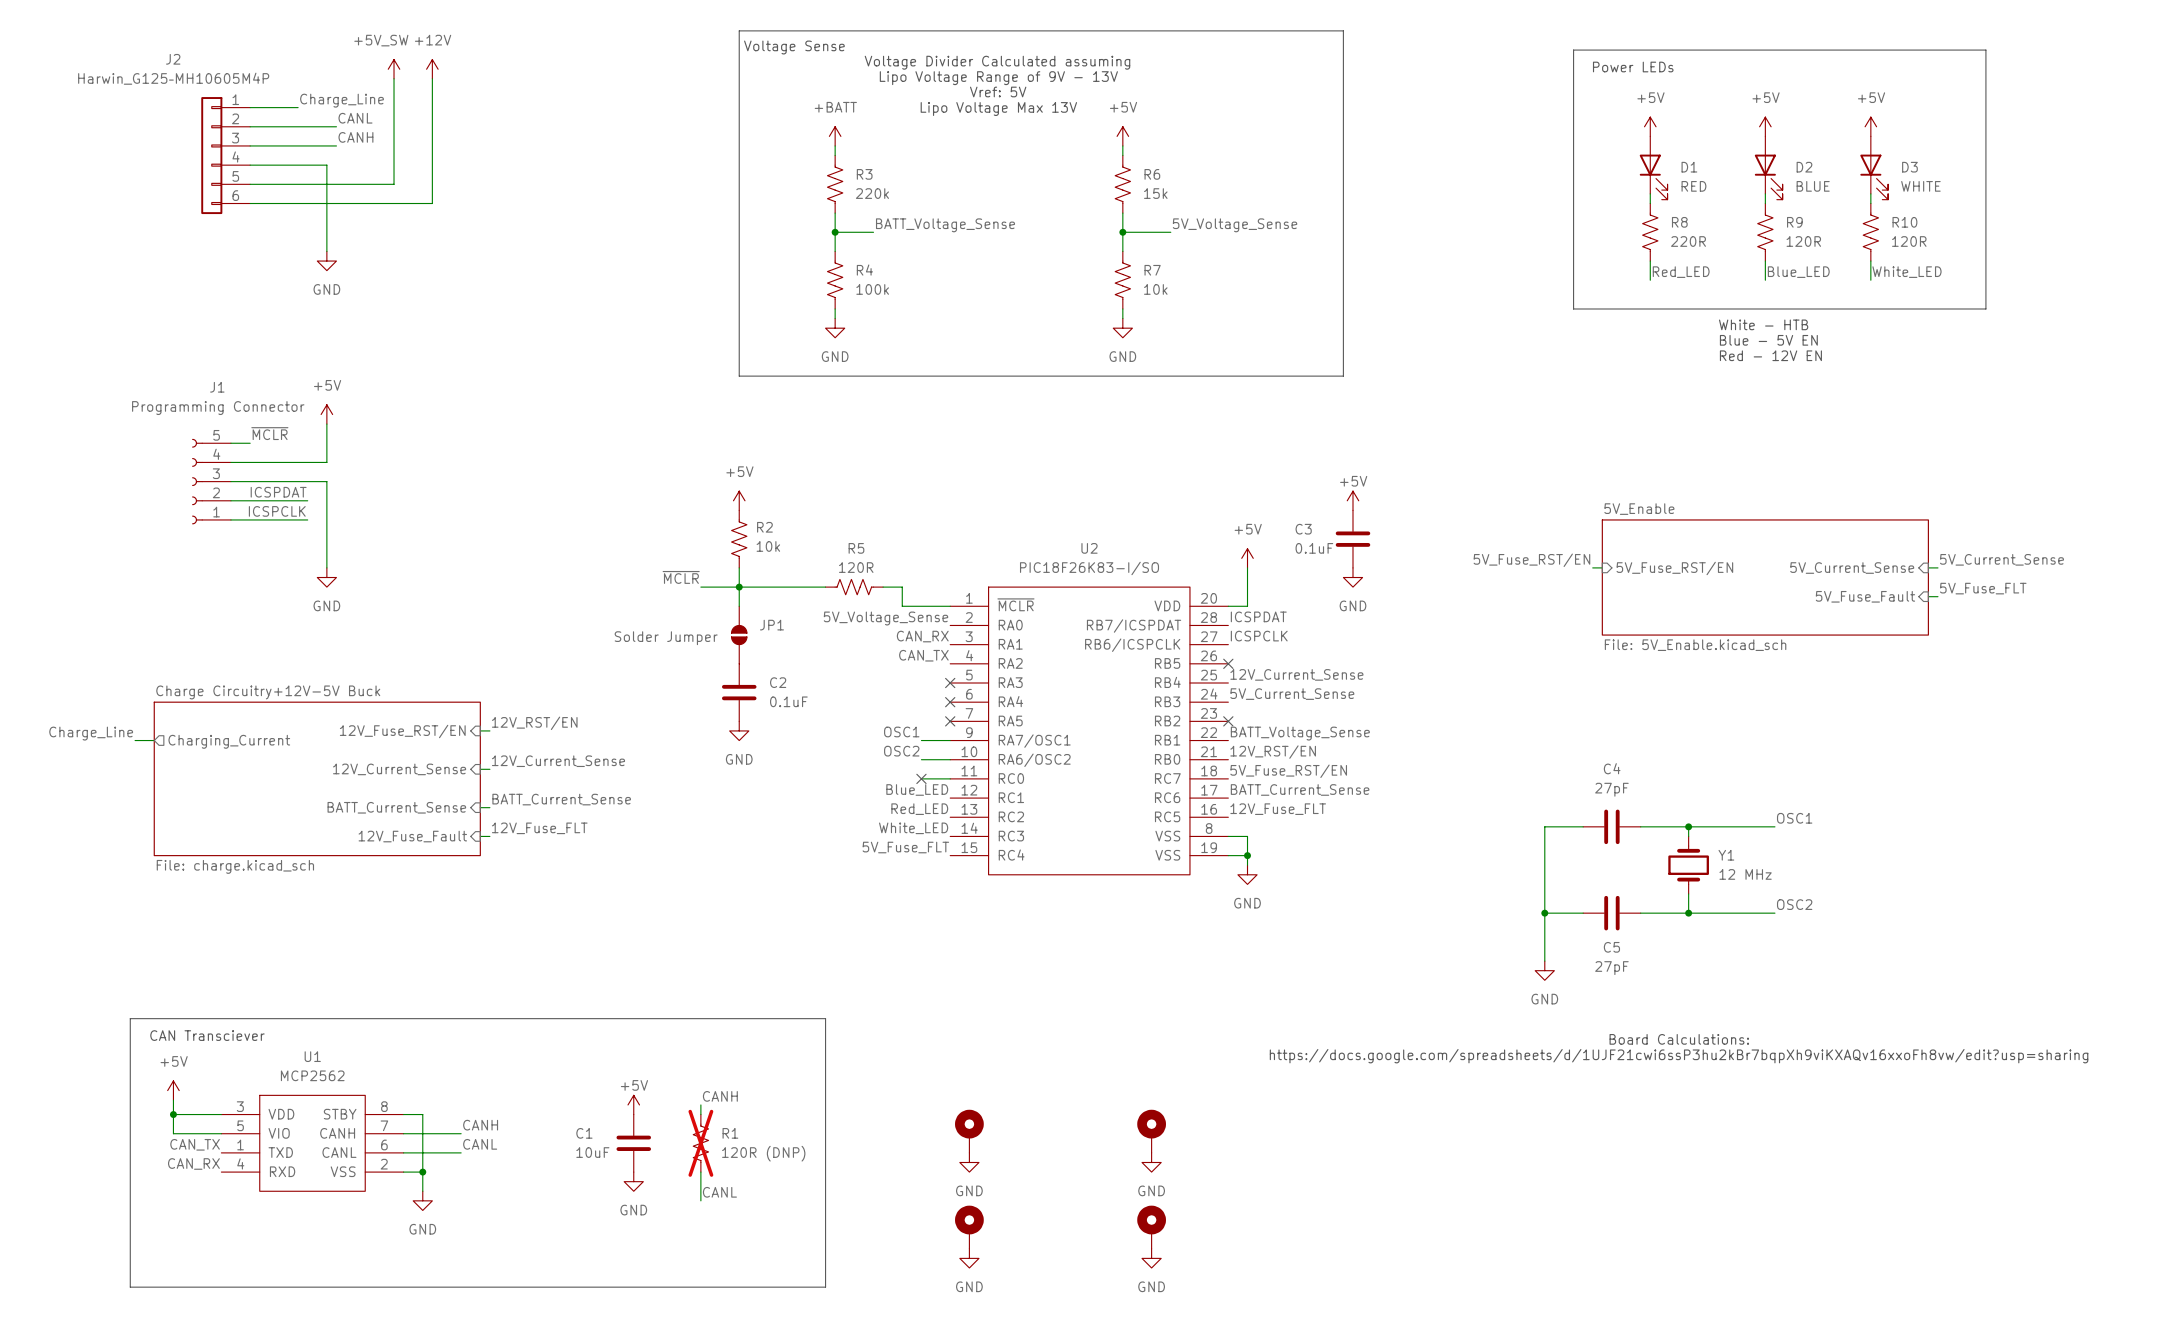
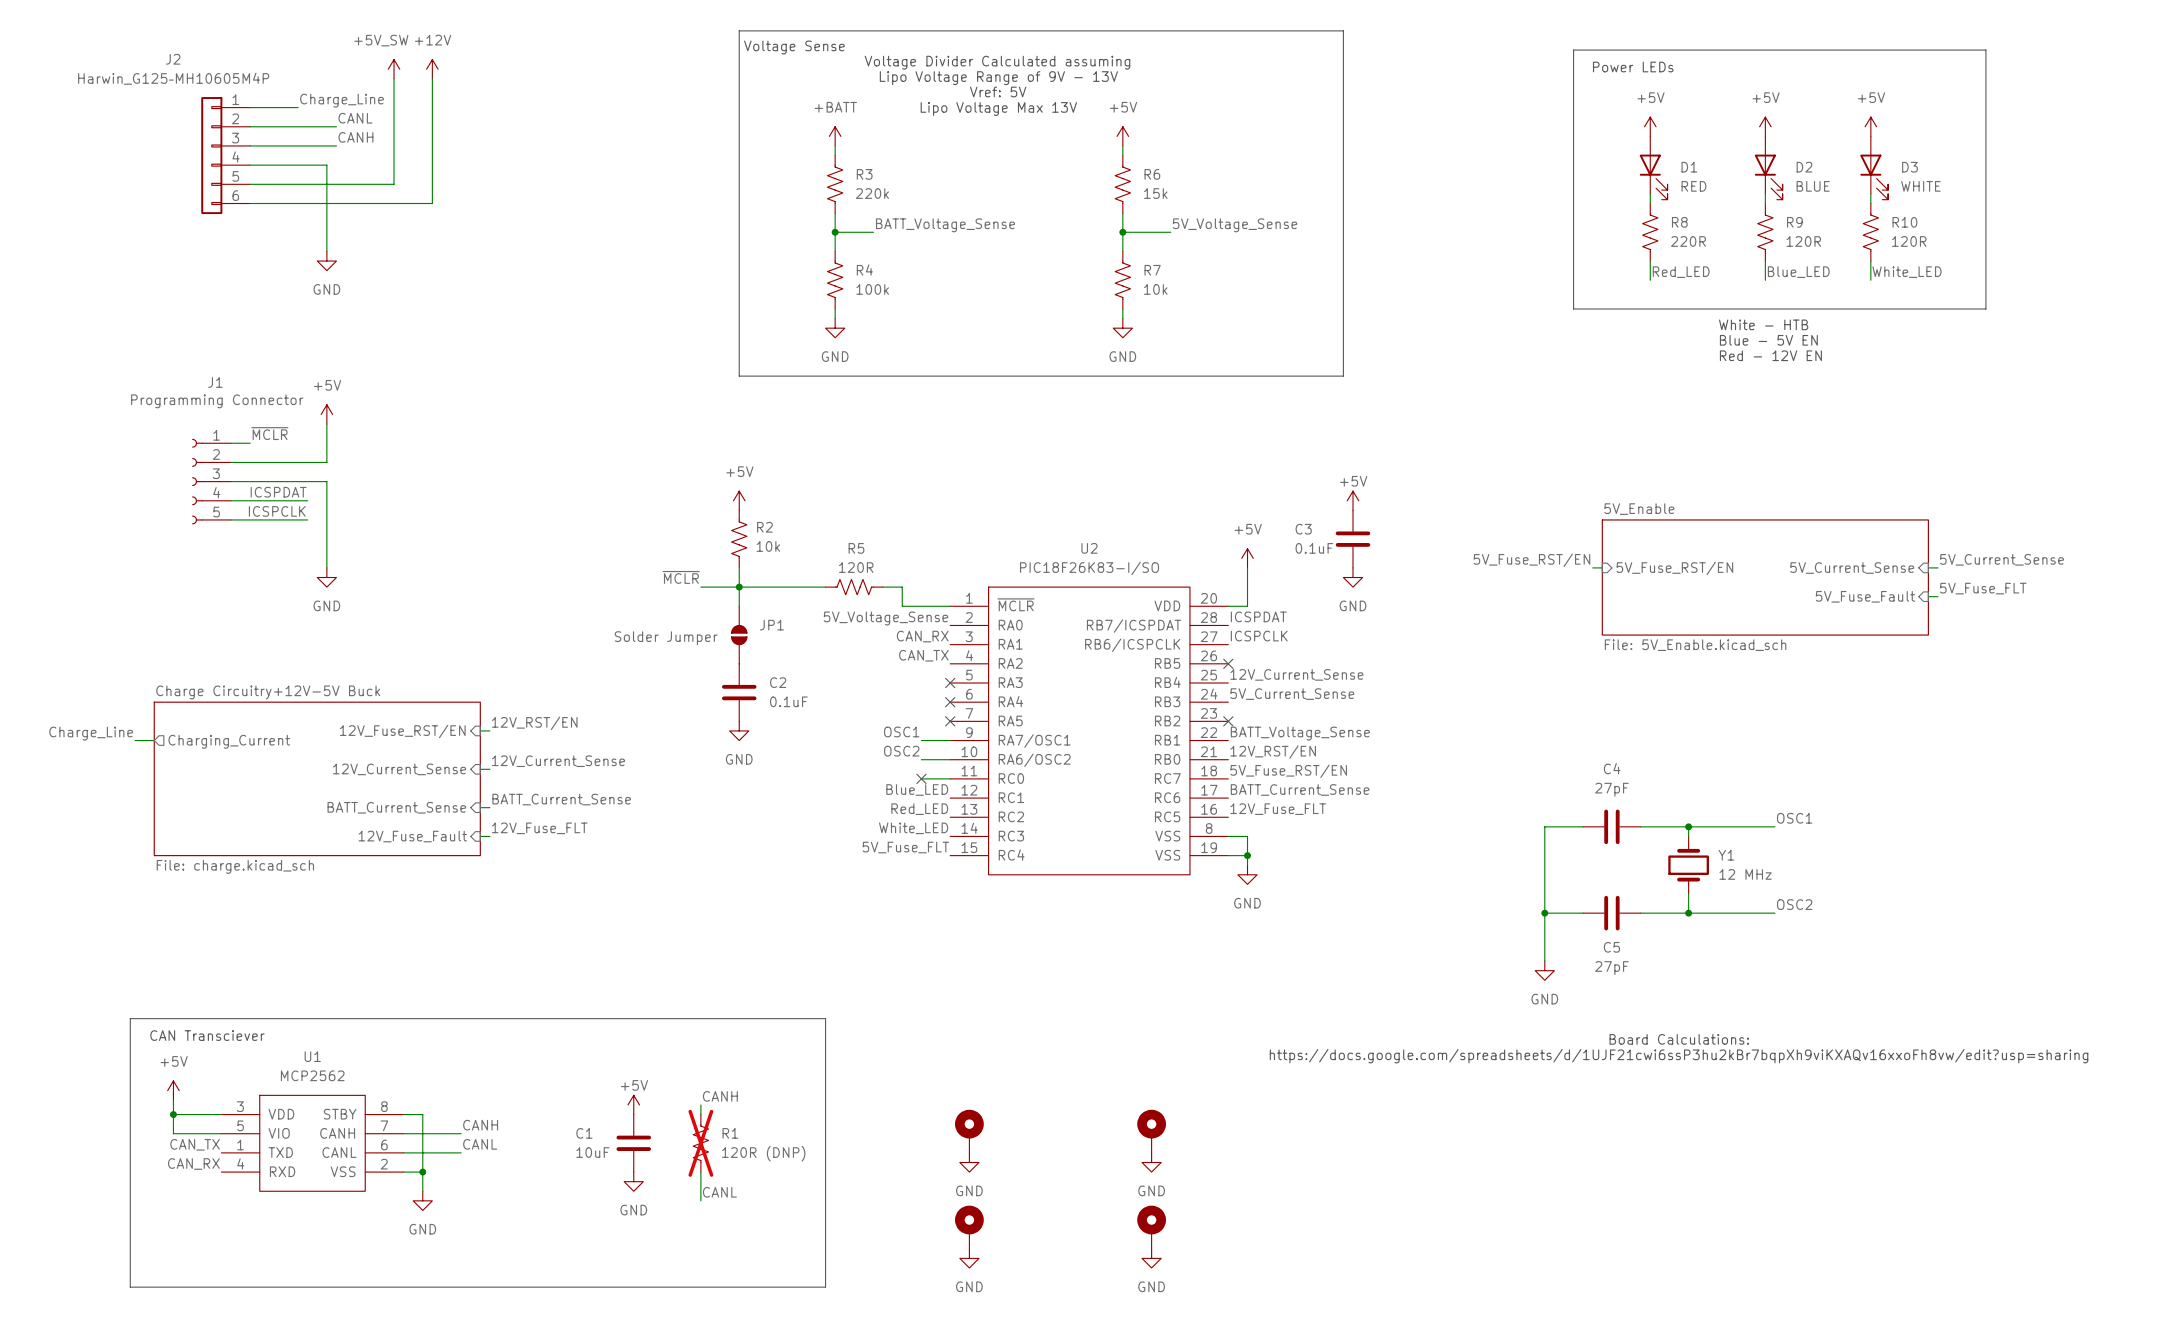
J1 flip: as is (197, 481) -> up-down (197, 481)

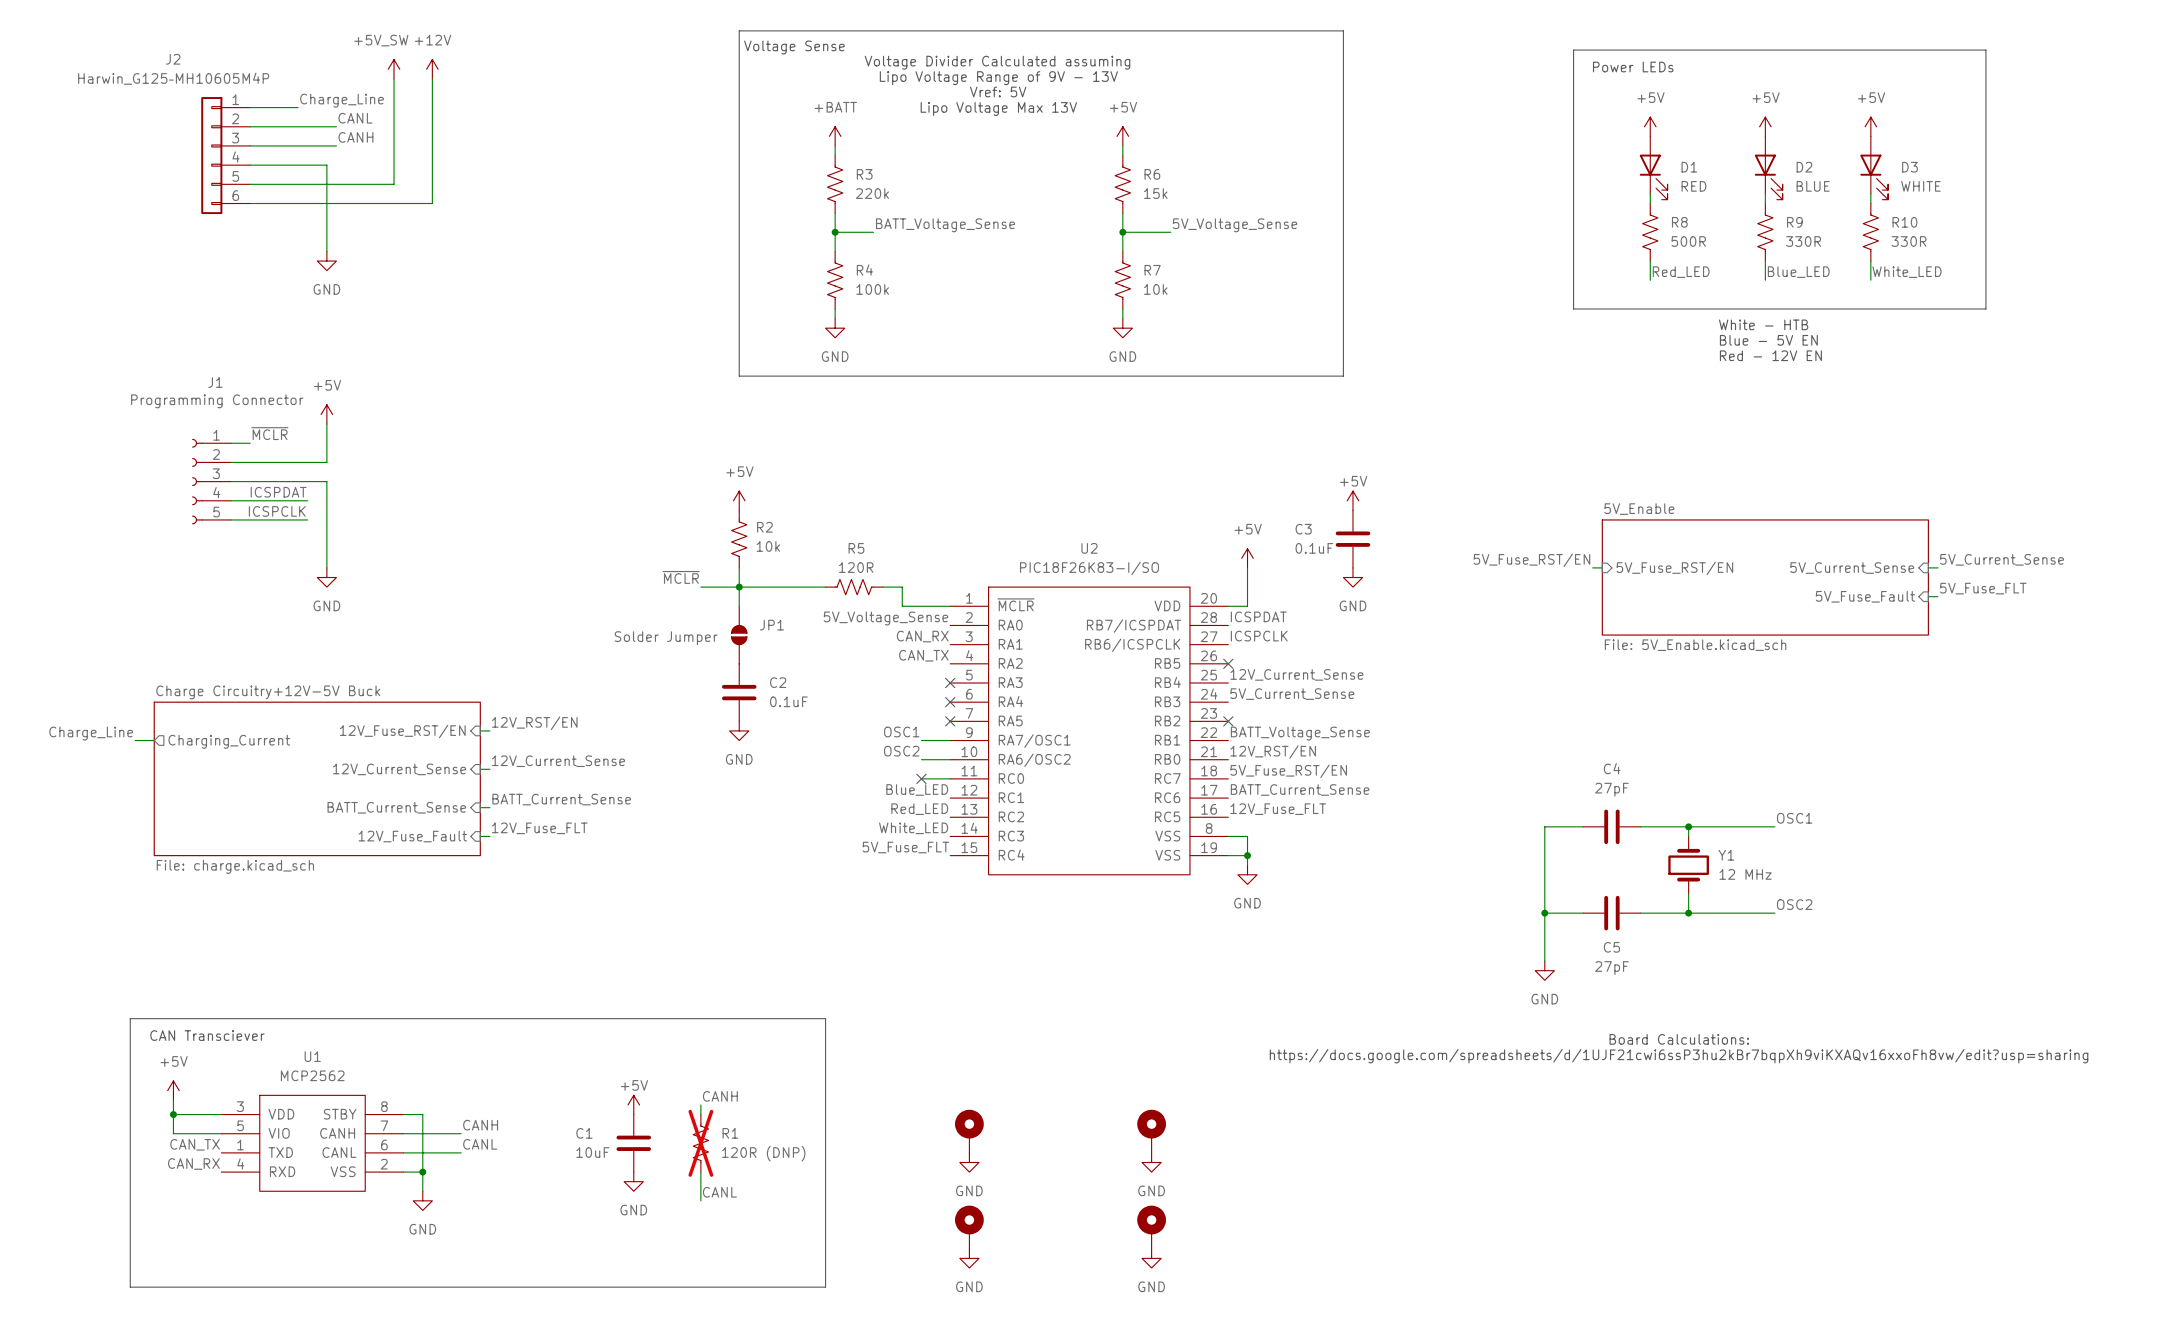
R8 value: 220R (1688, 241) -> 500R (1688, 241)
R9 value: 120R (1803, 241) -> 330R (1803, 241)
R10 value: 120R (1909, 241) -> 330R (1909, 241)

